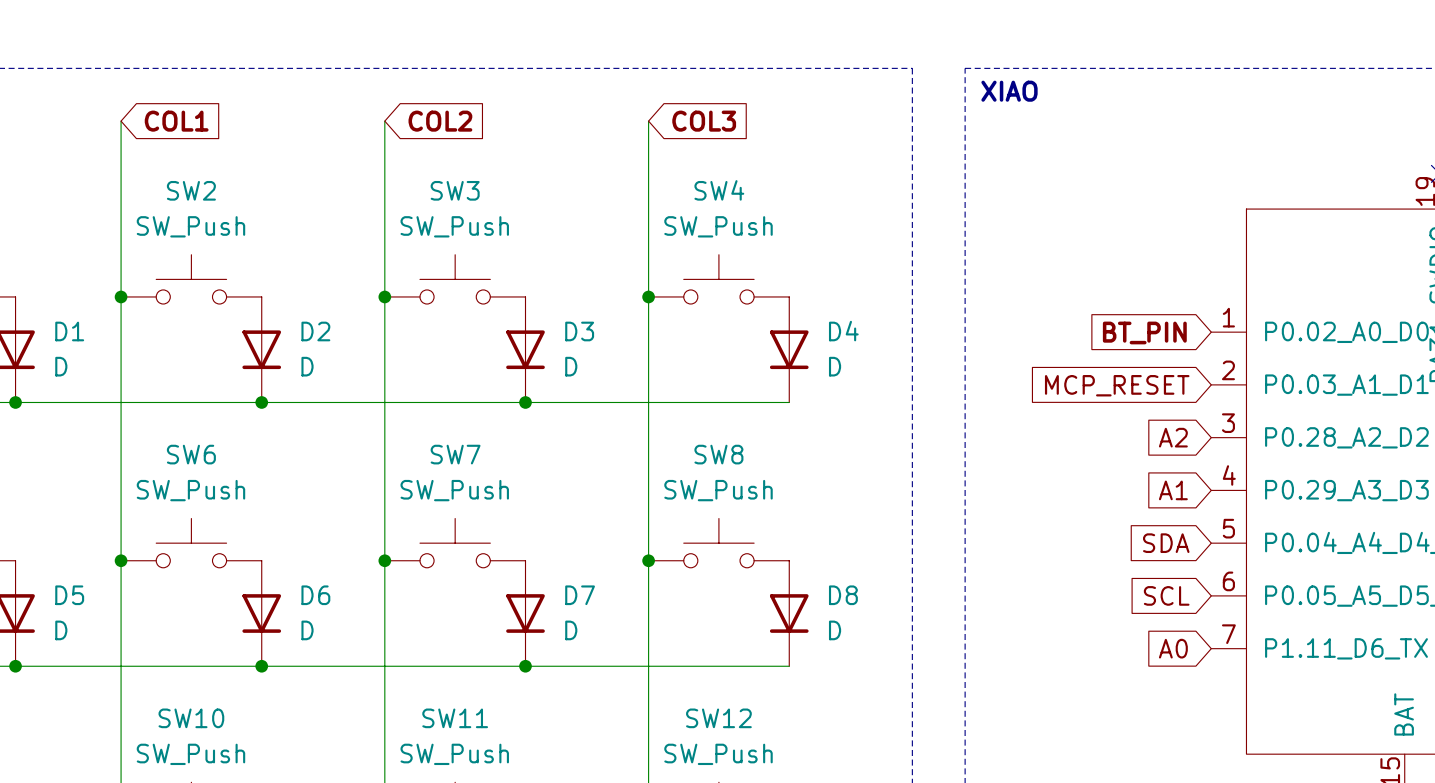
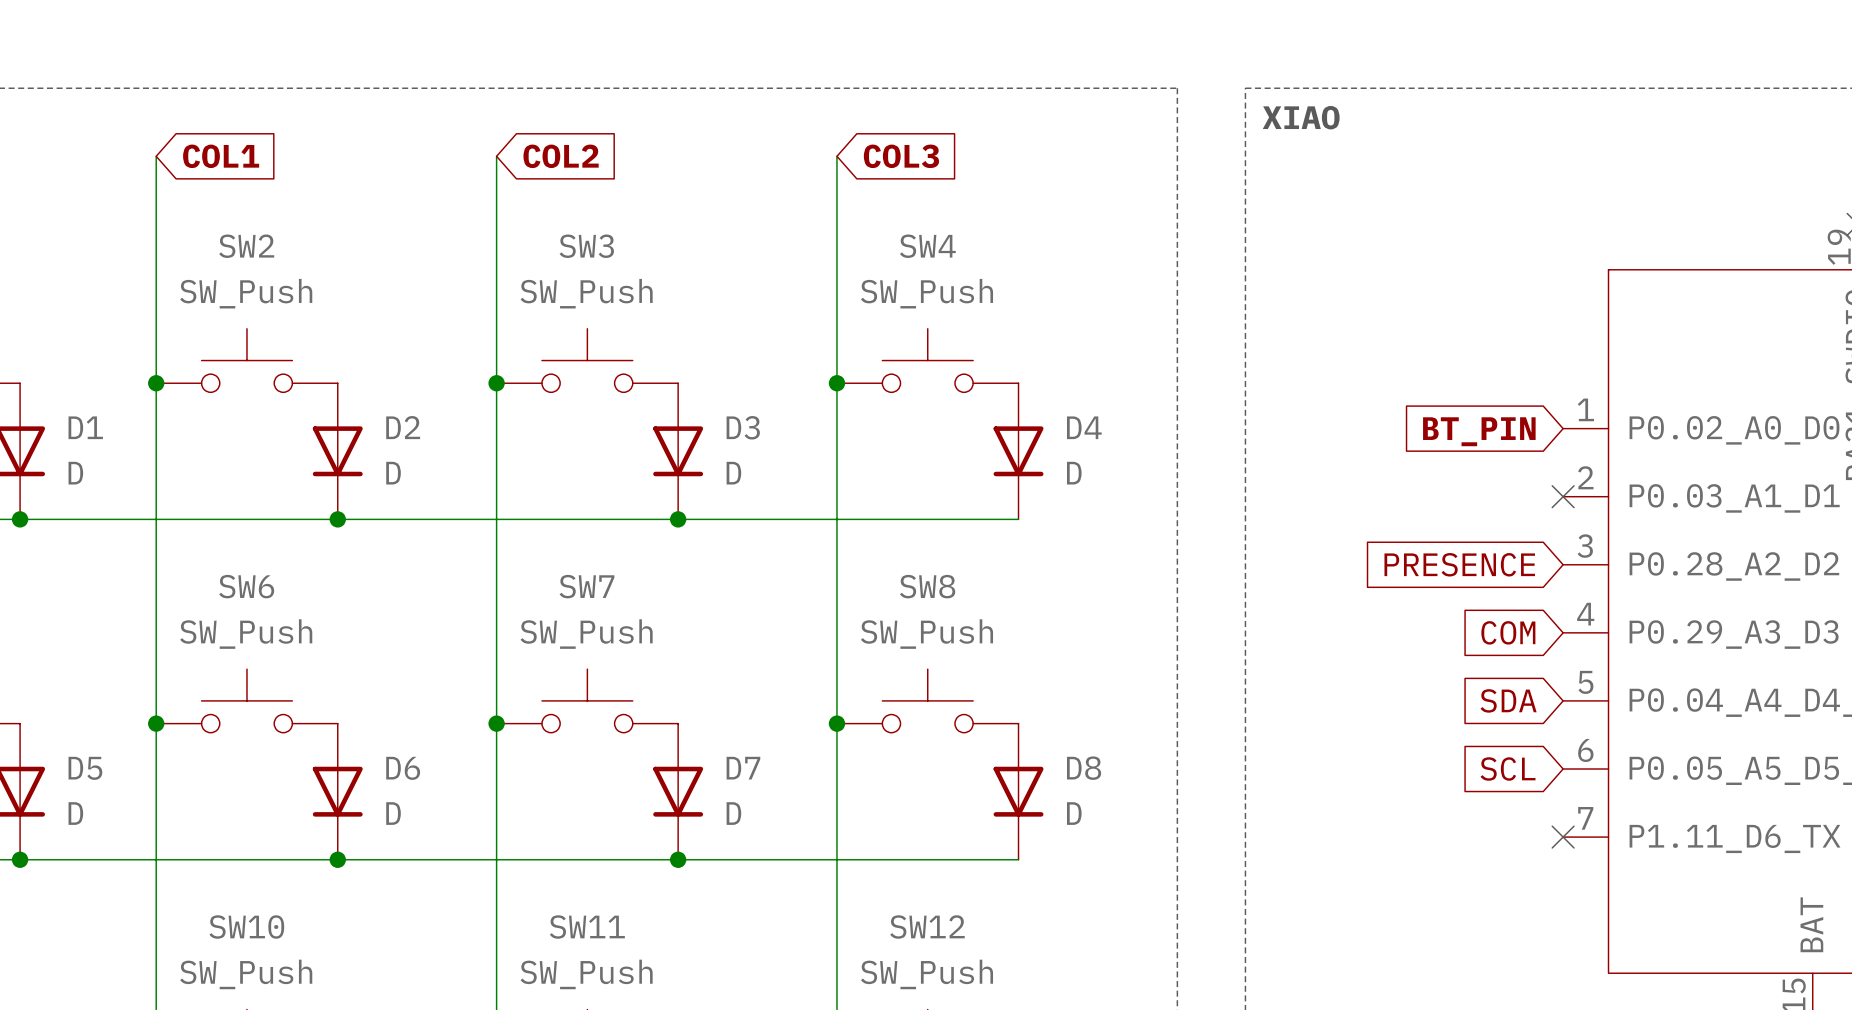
no-connect mark: none -> (1563, 496)
global label: MCP_RESET (1117, 385) -> none
global label: A2 (1173, 437) -> PRESENCE (1459, 564)
global label: A1 (1173, 490) -> COM (1508, 632)
global label: A0 (1173, 648) -> none
no-connect mark: none -> (1563, 837)

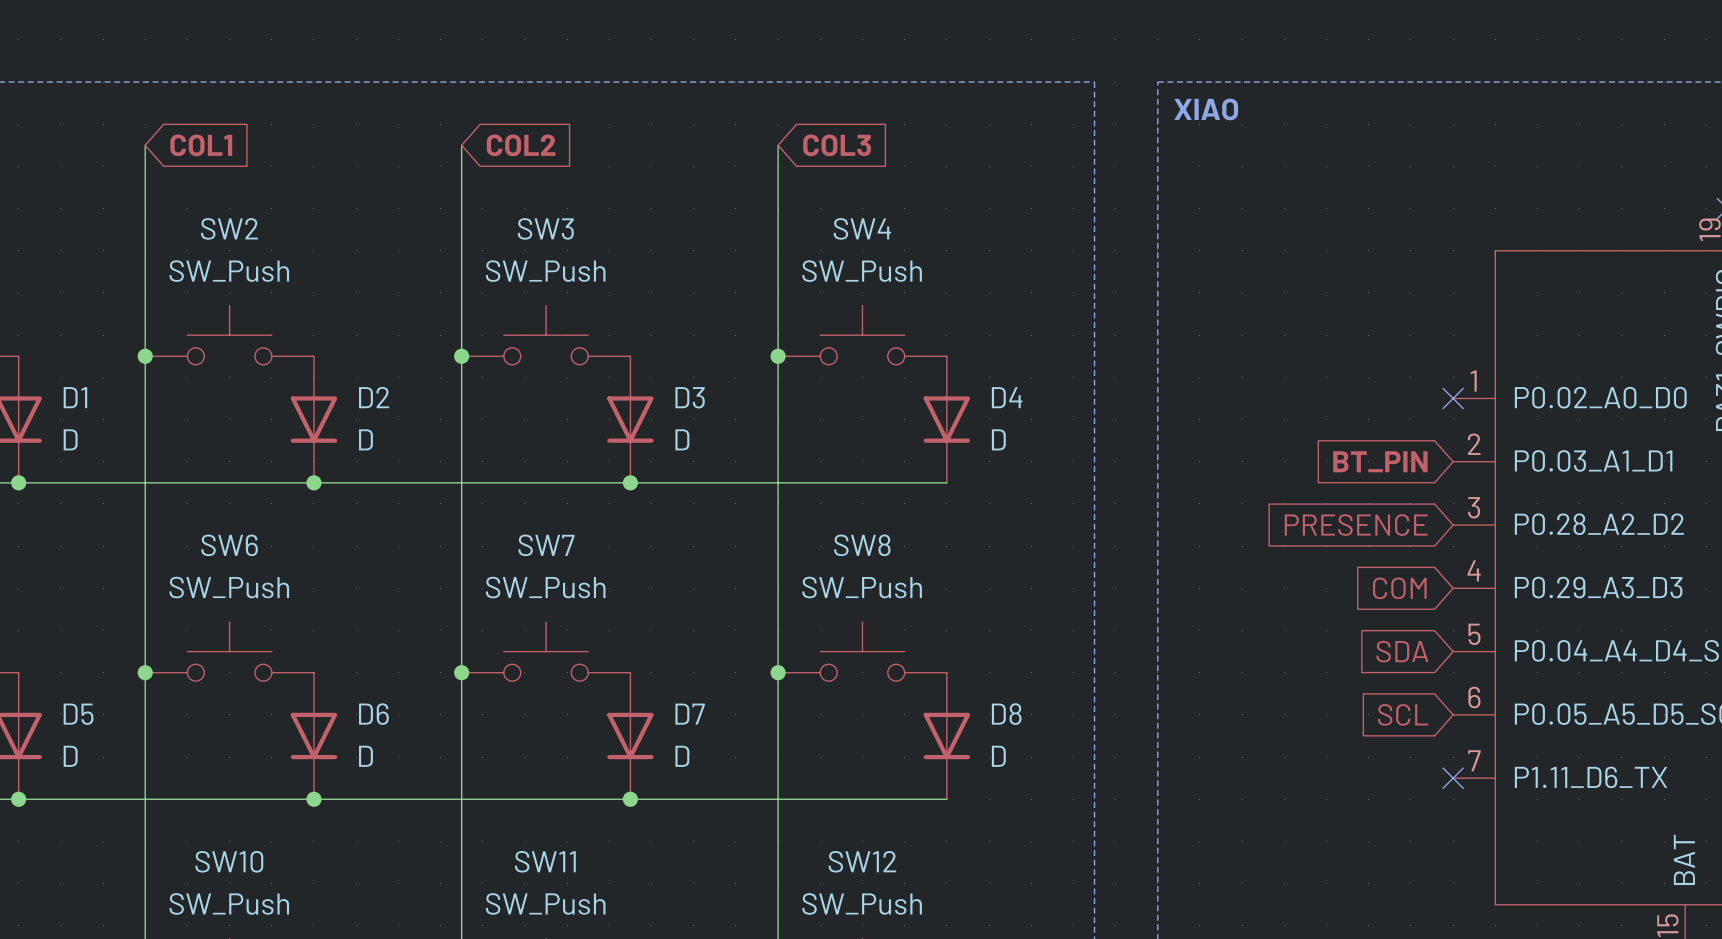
global label position: BT_PIN (1479, 431) -> BT_PIN (1380, 461)
no-connect mark position: (1563, 496) -> (1453, 398)

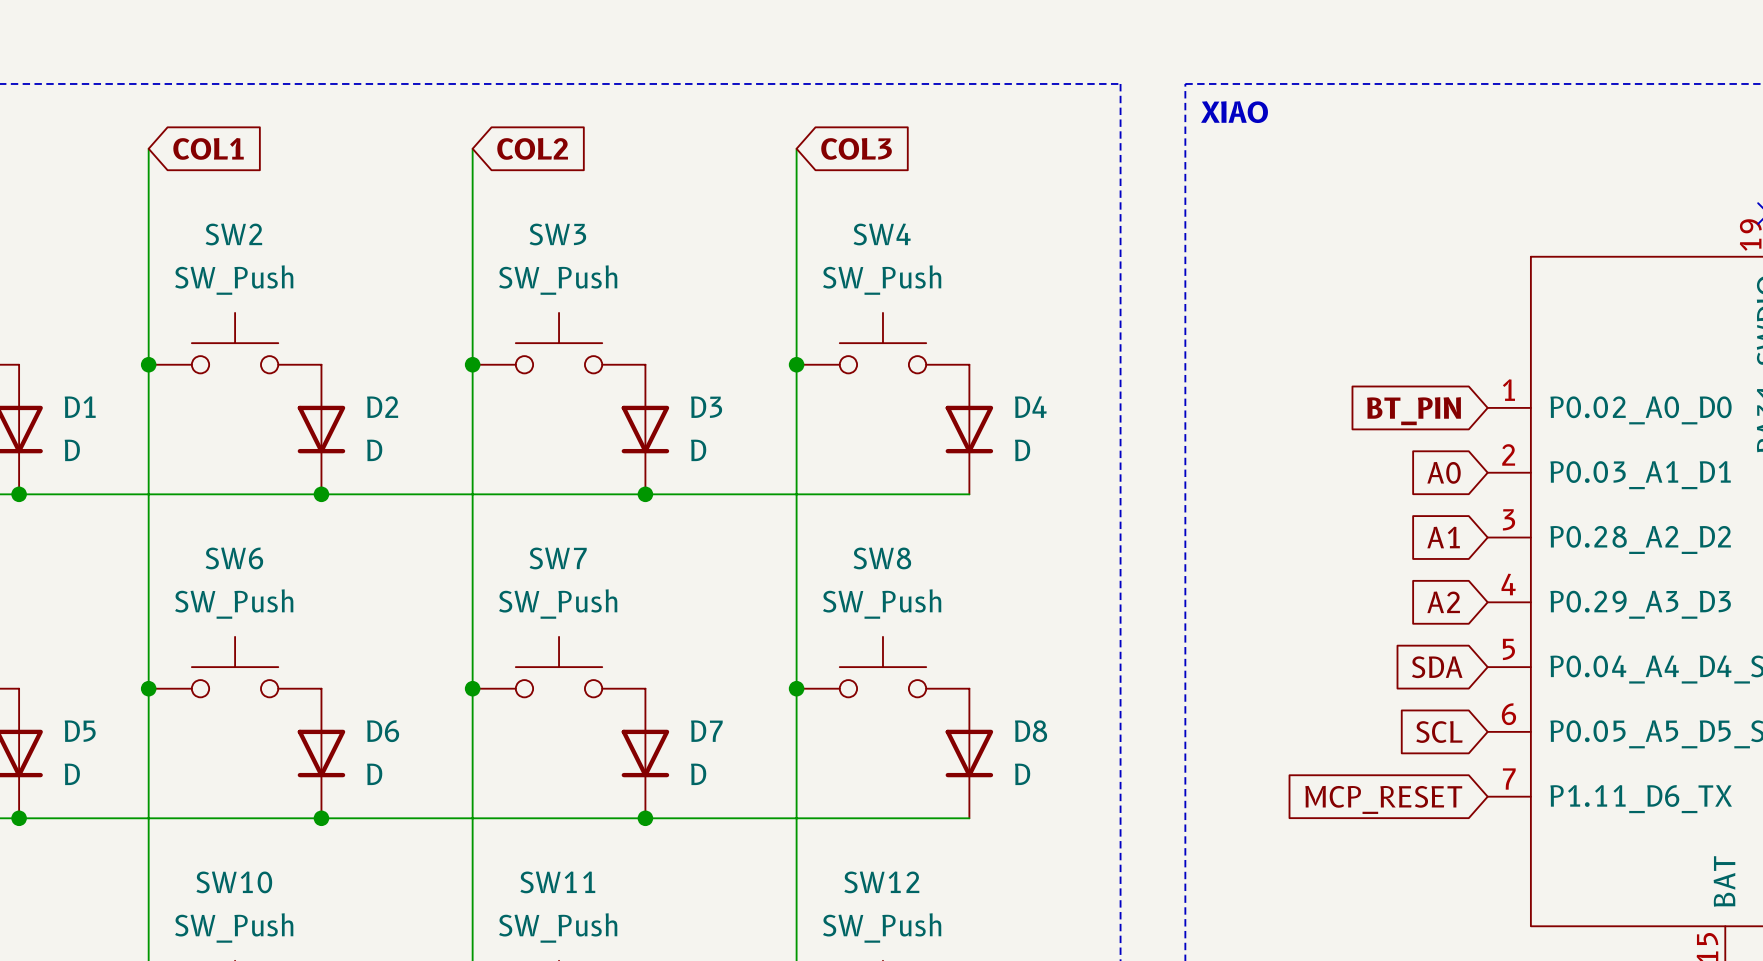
global label: none -> BT_PIN (1413, 411)
no-connect mark: (1453, 398) -> none
global label: BT_PIN (1380, 461) -> A0 (1444, 472)
global label: PRESENCE (1356, 525) -> A1 (1443, 537)
global label: COM (1399, 588) -> A2 (1443, 602)
global label: none -> MCP_RESET (1383, 799)
no-connect mark: (1453, 778) -> none

